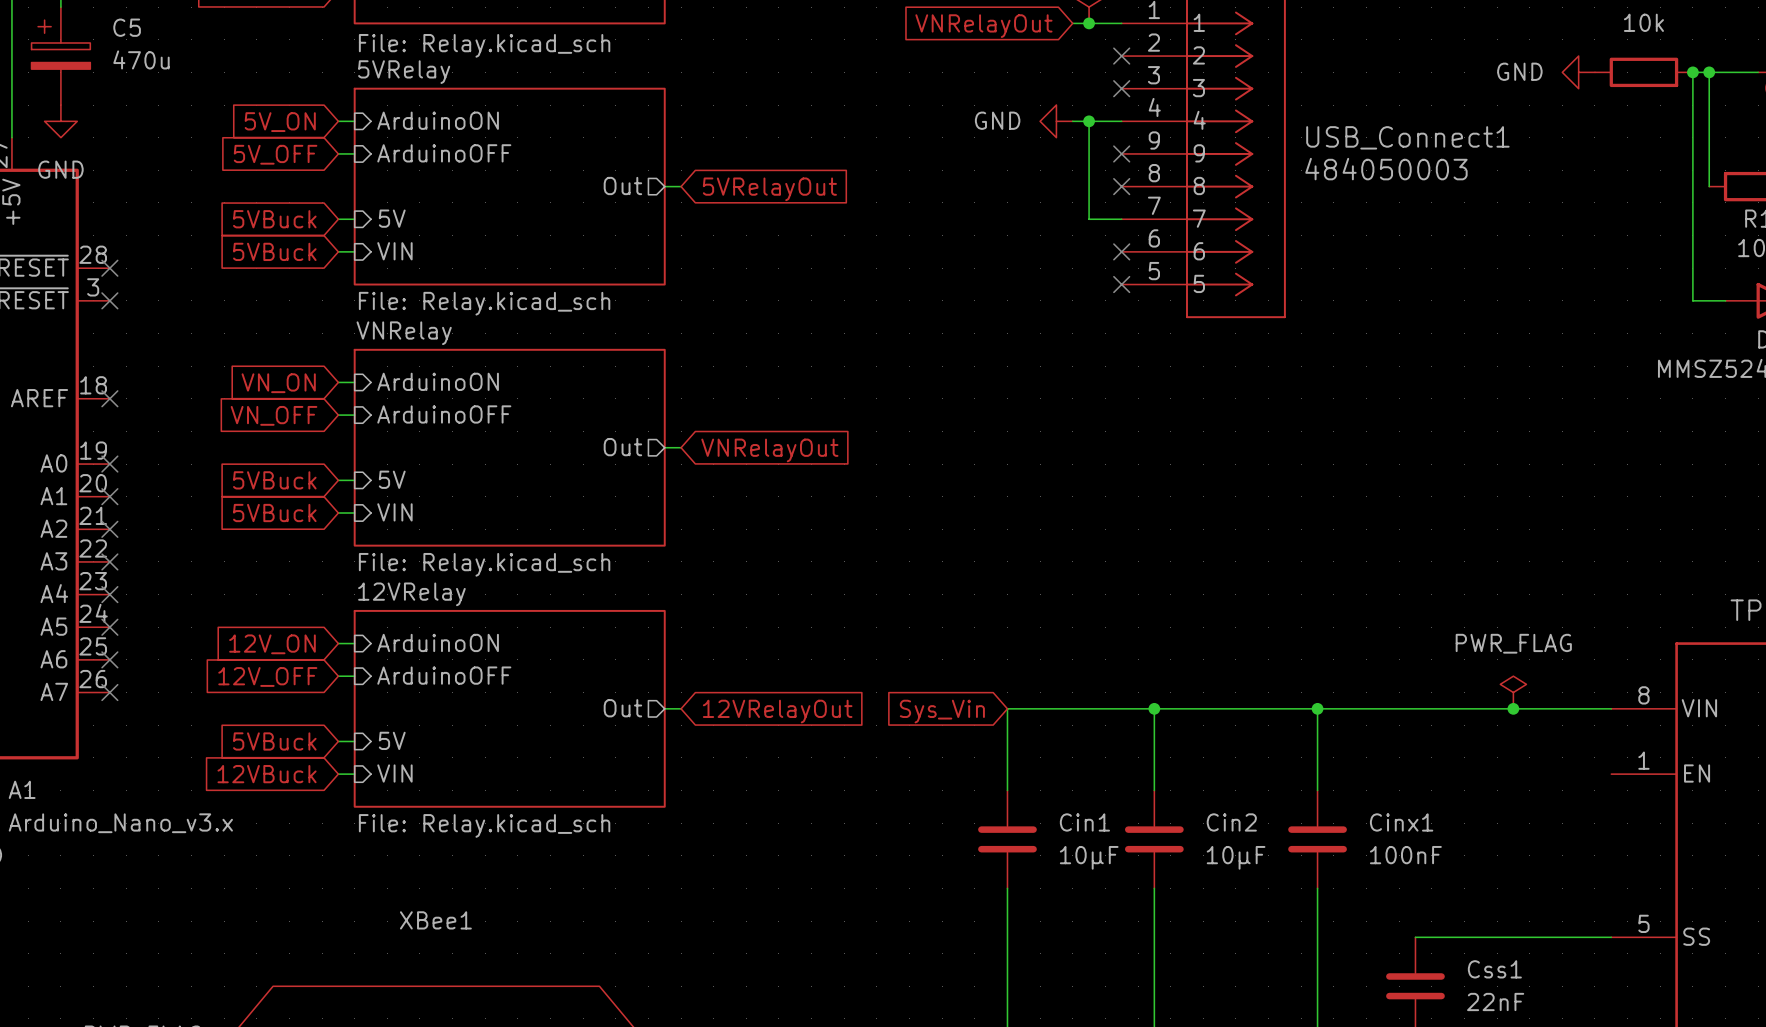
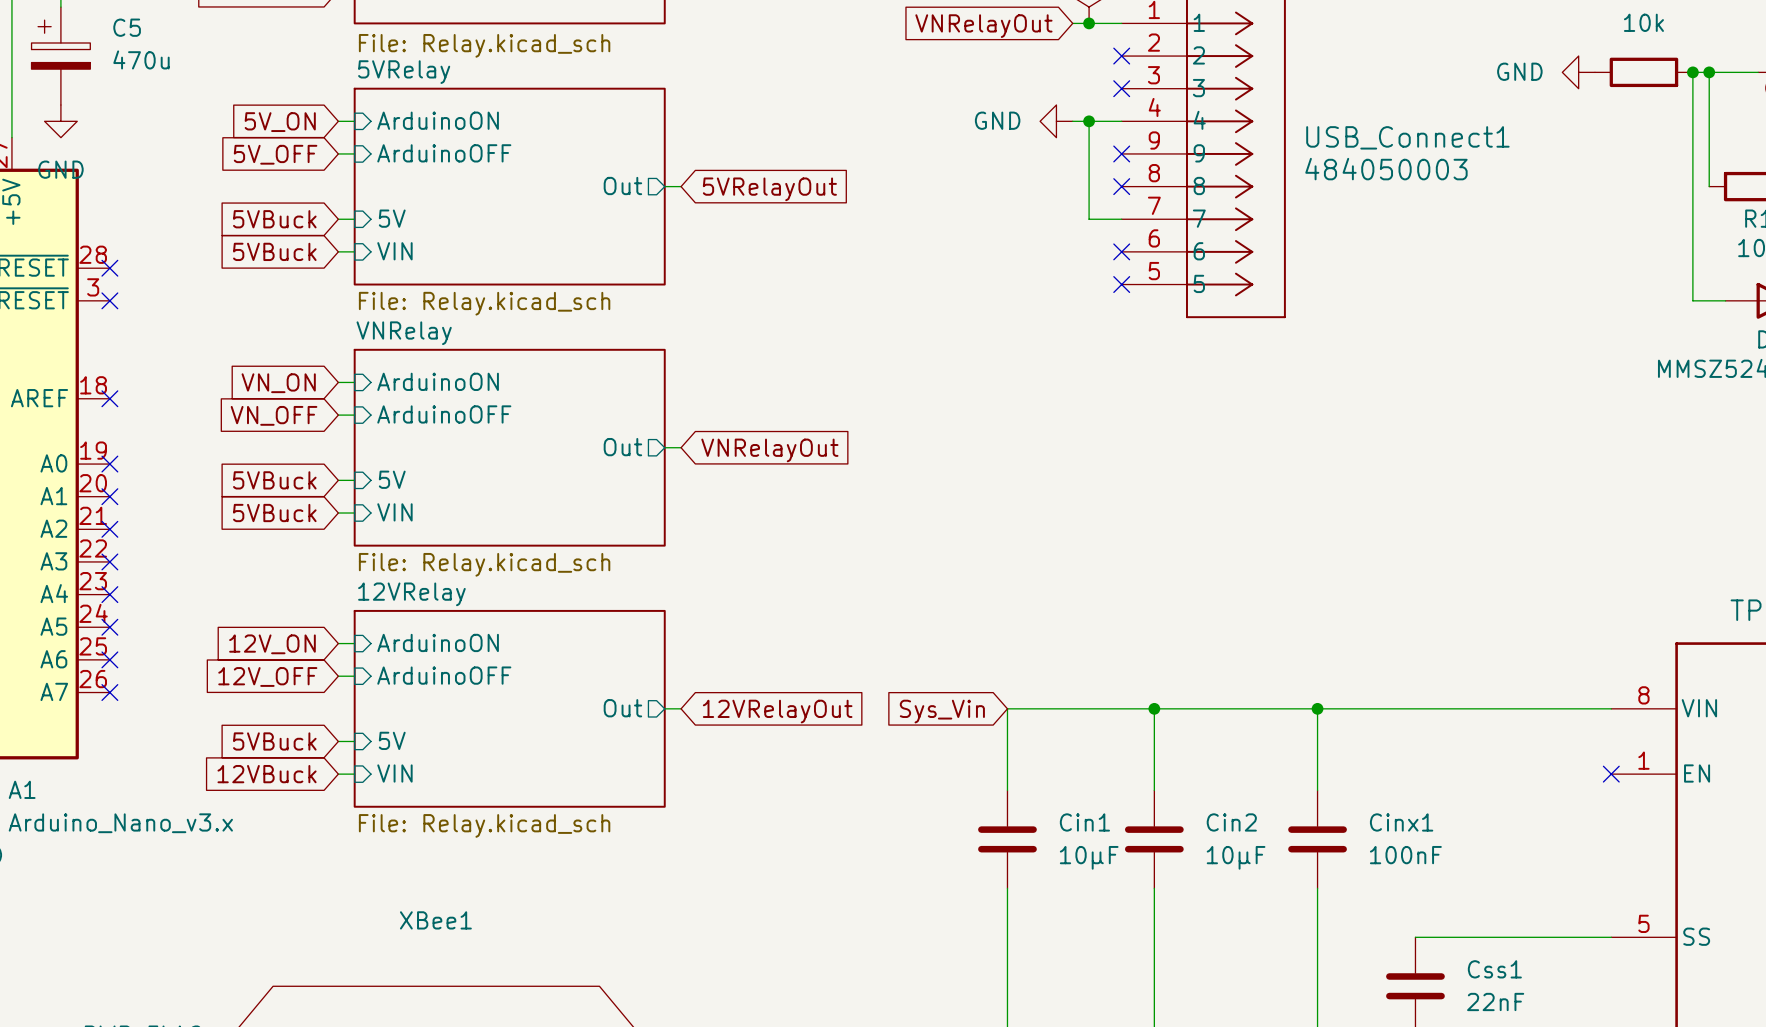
power symbol: PWR_FLAG (1513, 692) -> none
junction: (1513, 708) -> none
no-connect mark: none -> (1611, 774)

